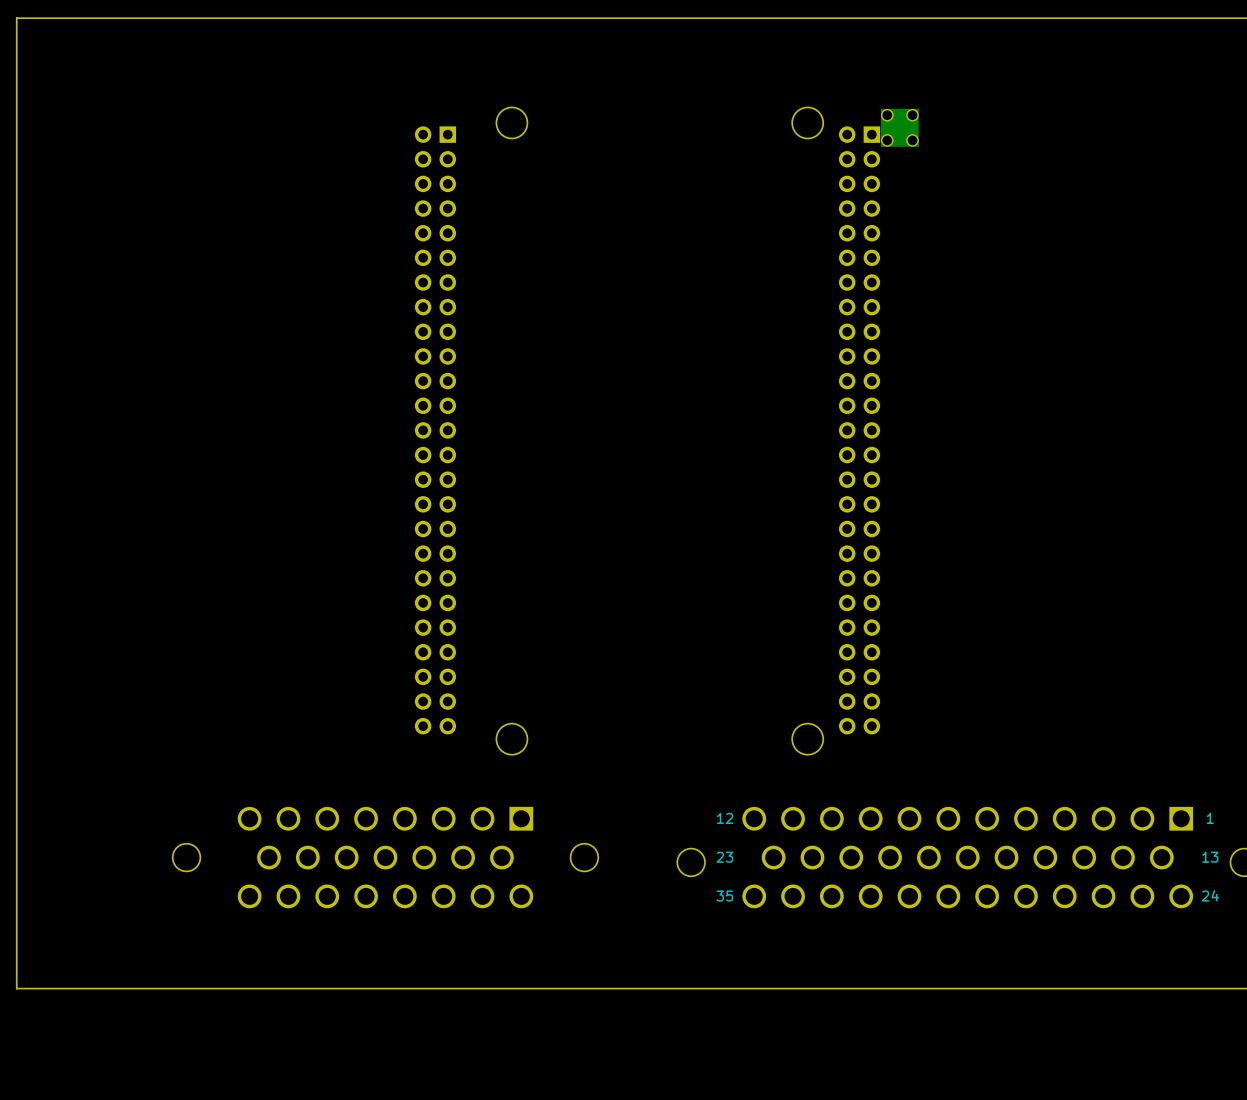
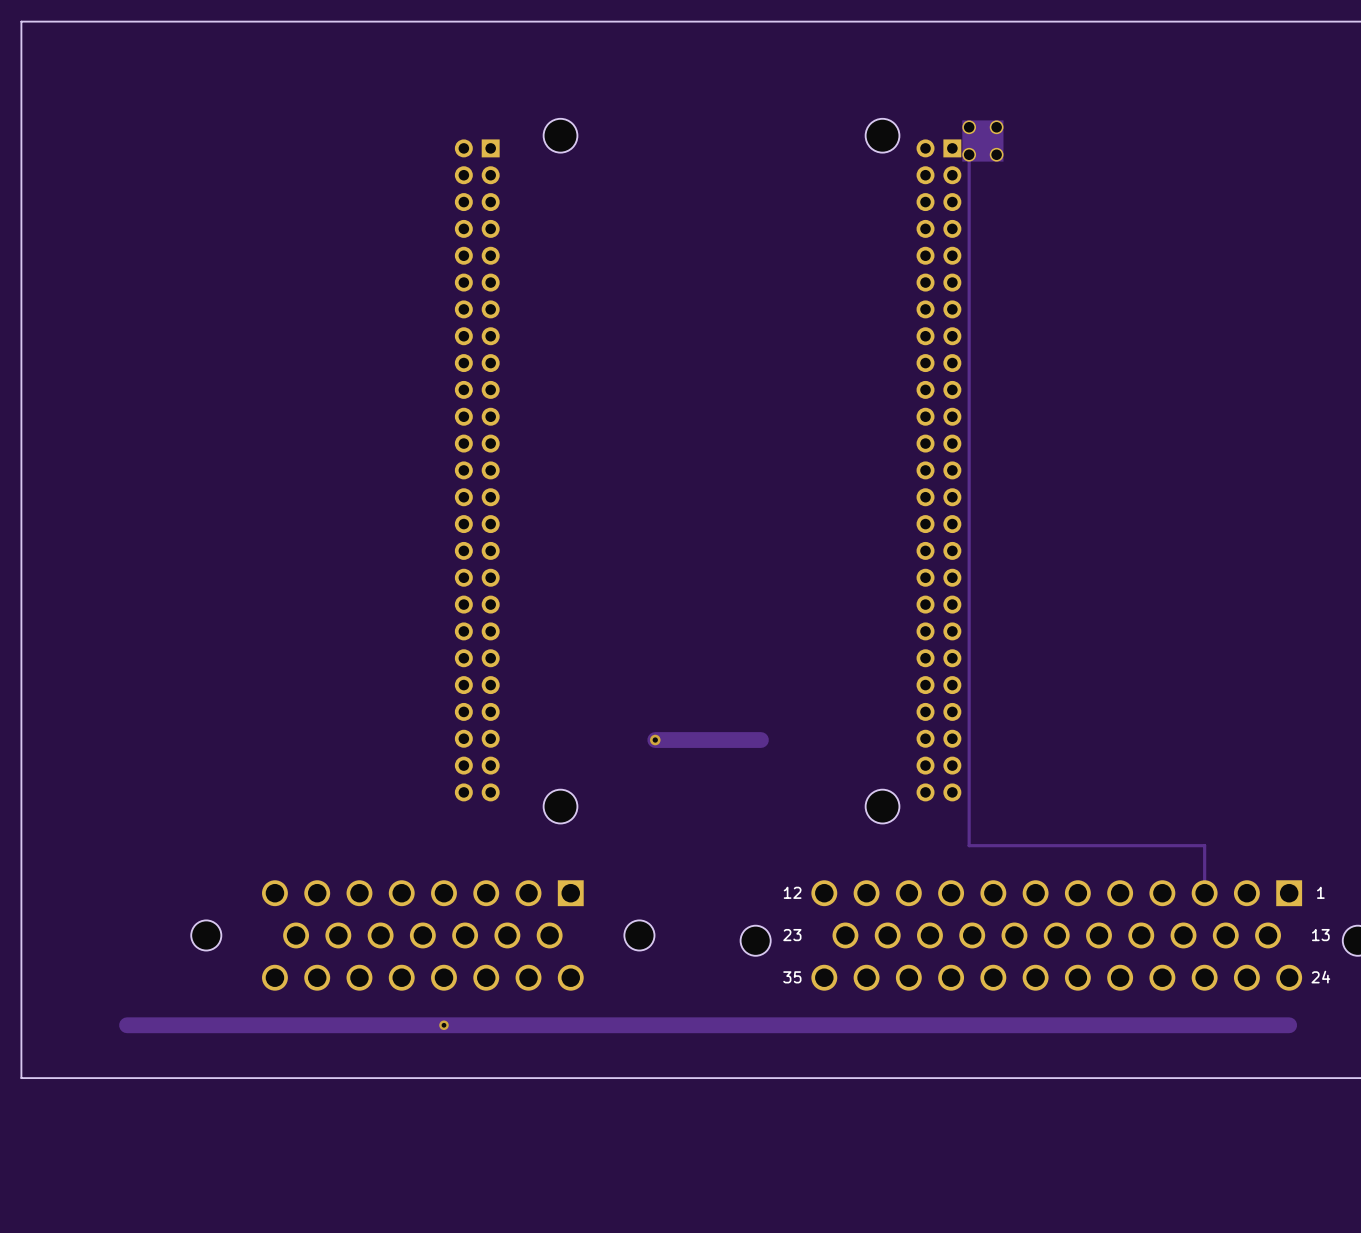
track: none -> (969, 154) (969, 845) (1204, 845) (1204, 893)
via: none -> (655, 740)
track: none -> (760, 740) (655, 740)
via: none -> (443, 1025)
track: none -> (1289, 1025) (127, 1025)

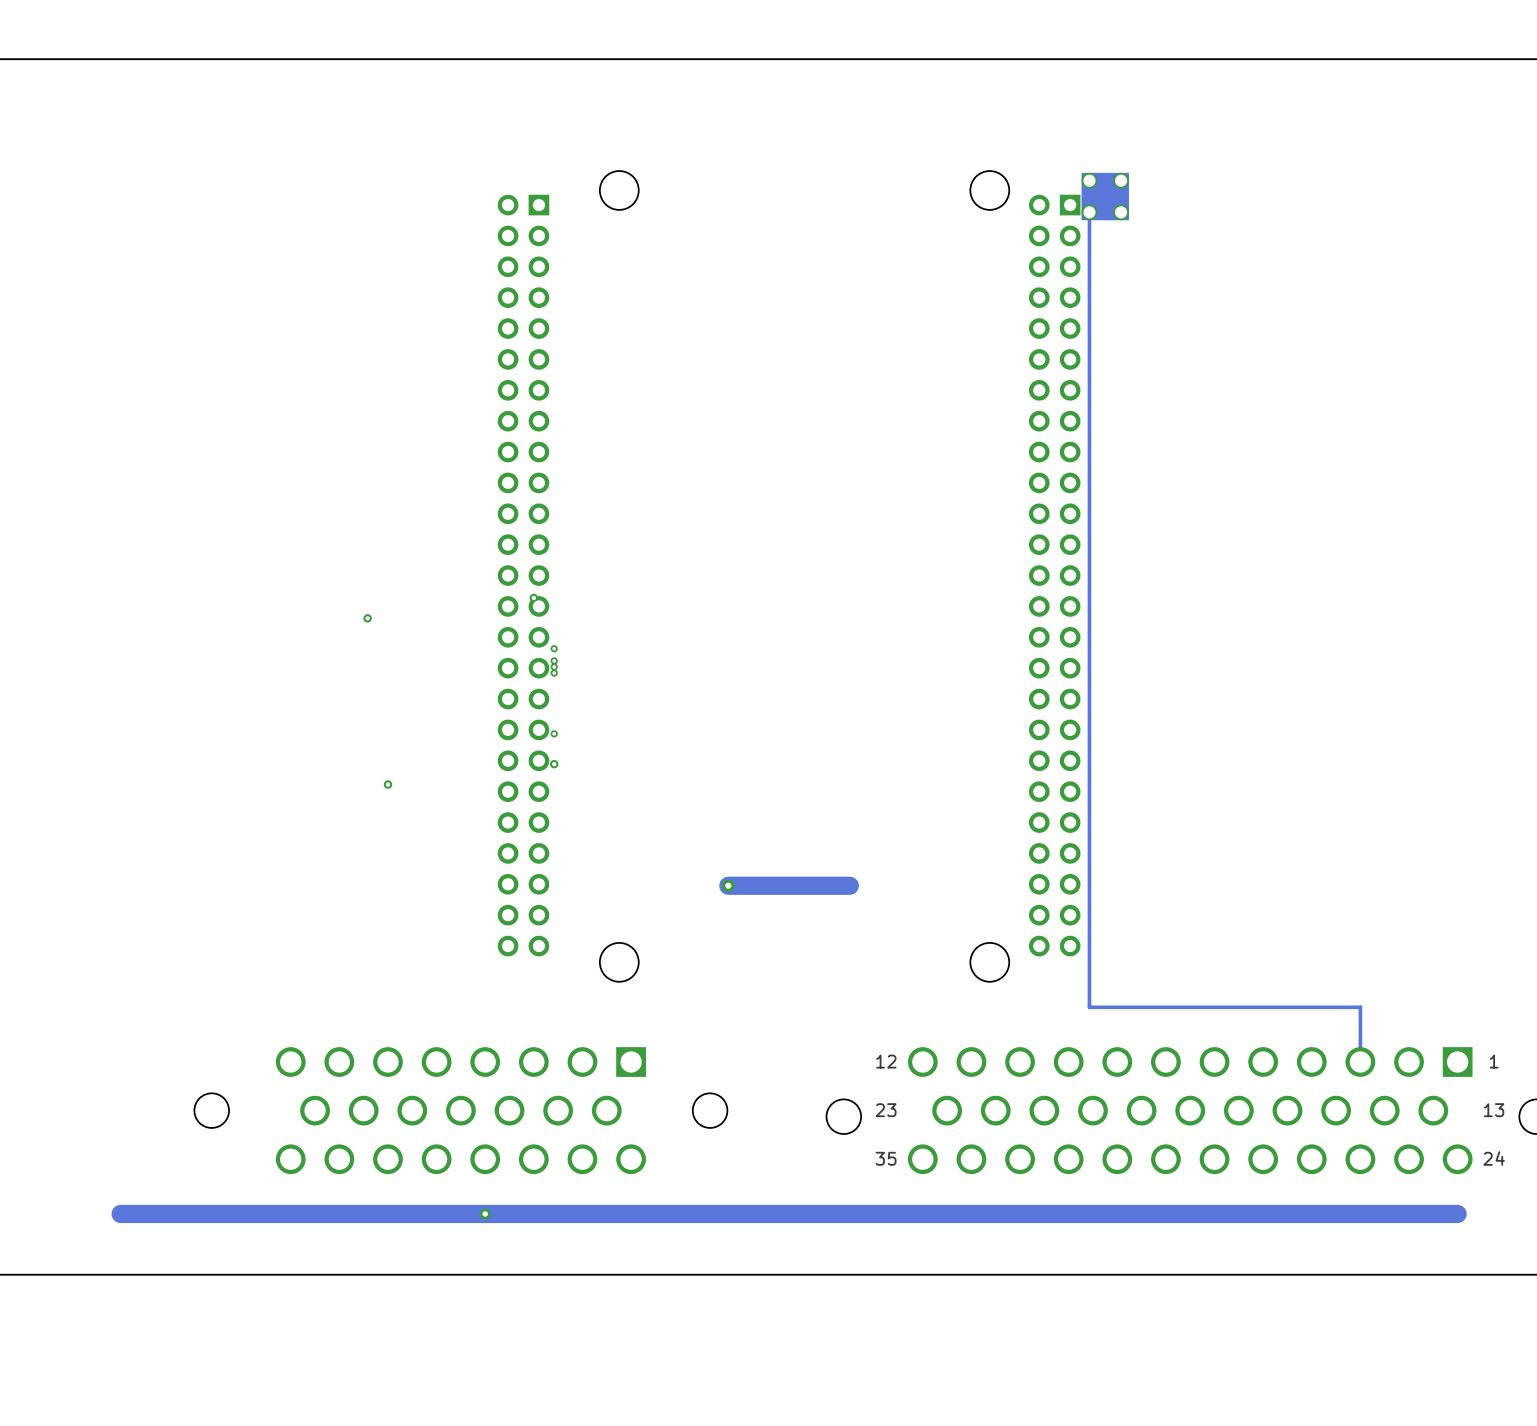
via: none -> (533, 597)
via: none -> (367, 618)
via: none -> (554, 648)
via: none -> (554, 660)
via: none -> (554, 666)
via: none -> (554, 673)
via: none -> (554, 733)
via: none -> (554, 764)
via: none -> (387, 784)

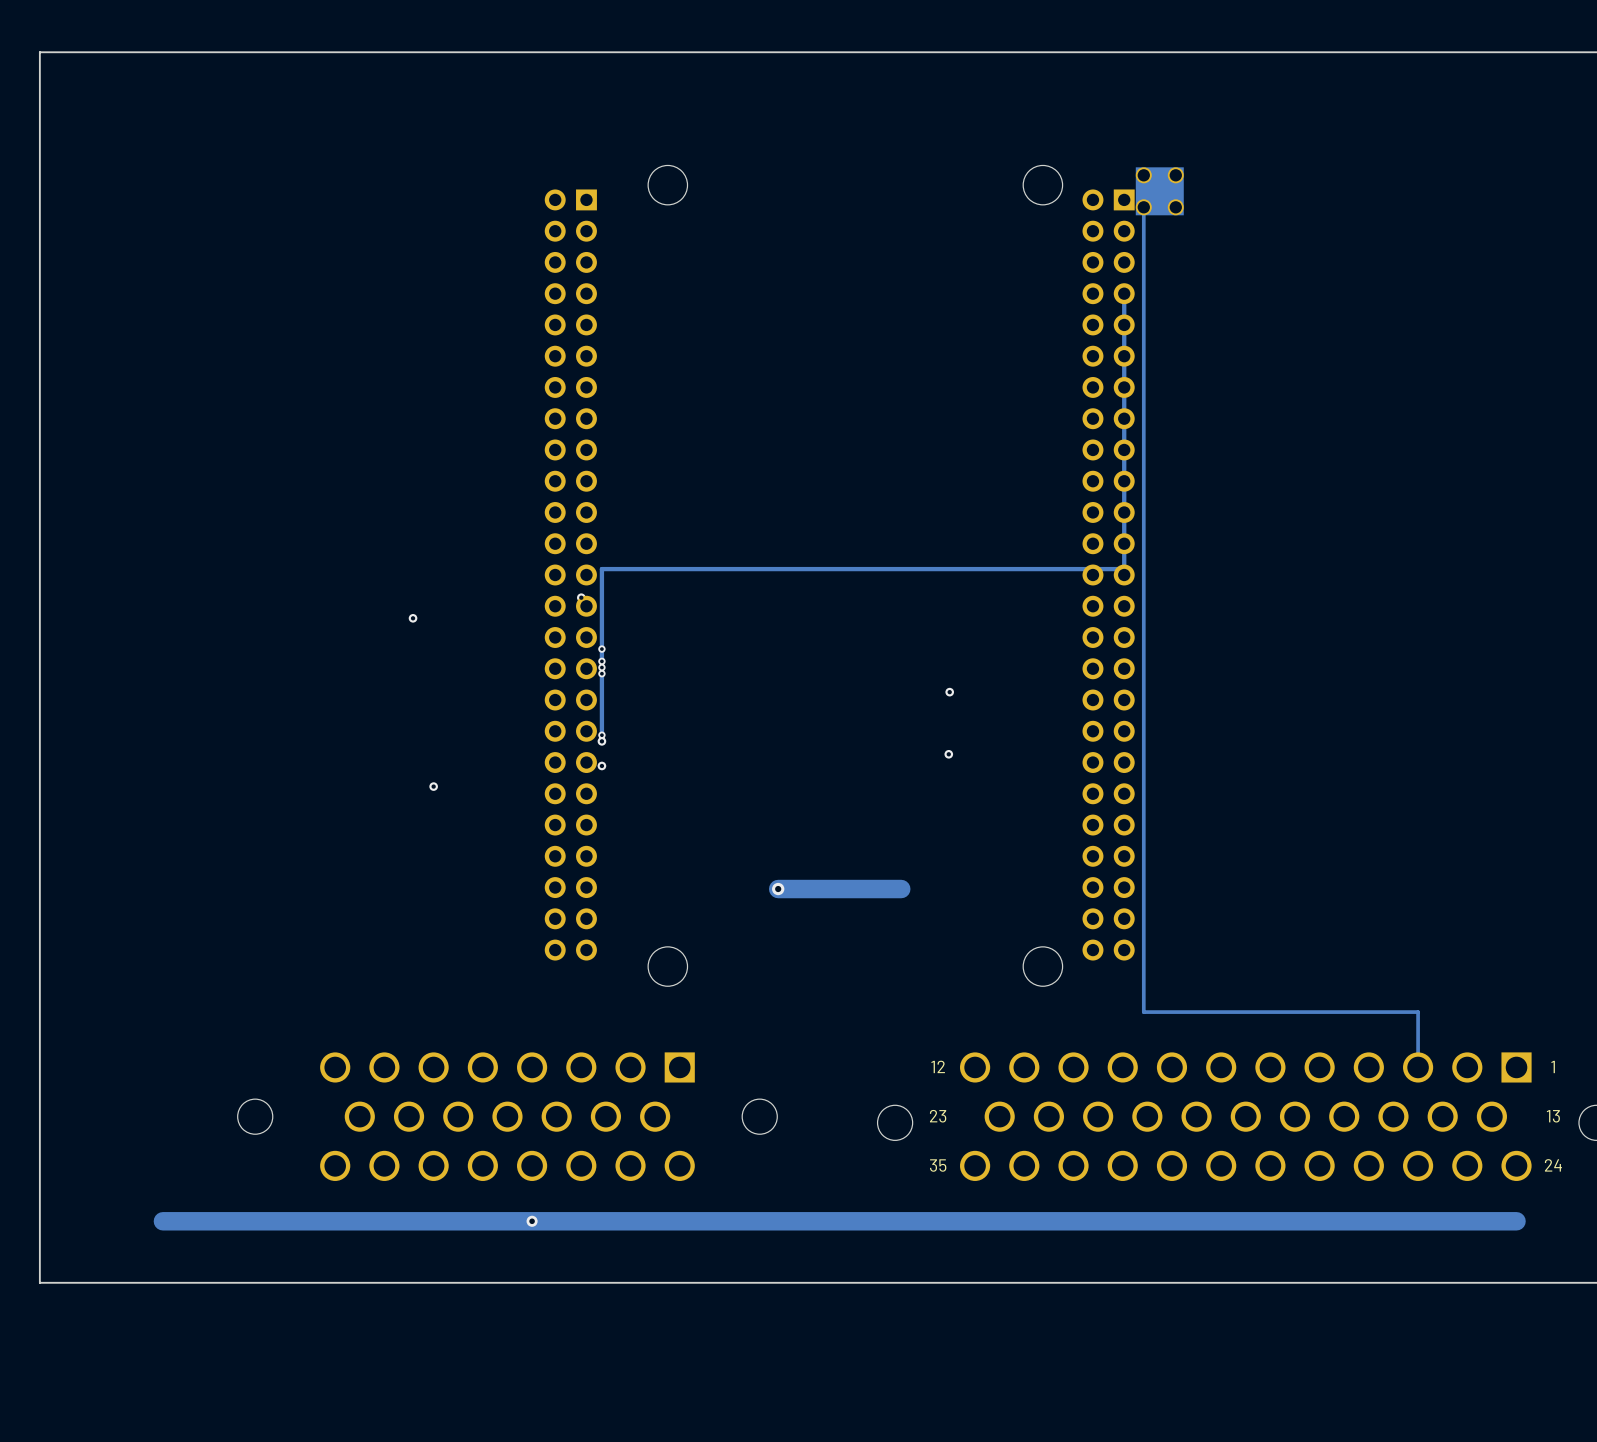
track: none -> (1124, 293) (1124, 569) (601, 569) (601, 741)
via: none -> (949, 692)
via: none -> (601, 741)
via: none -> (948, 754)

